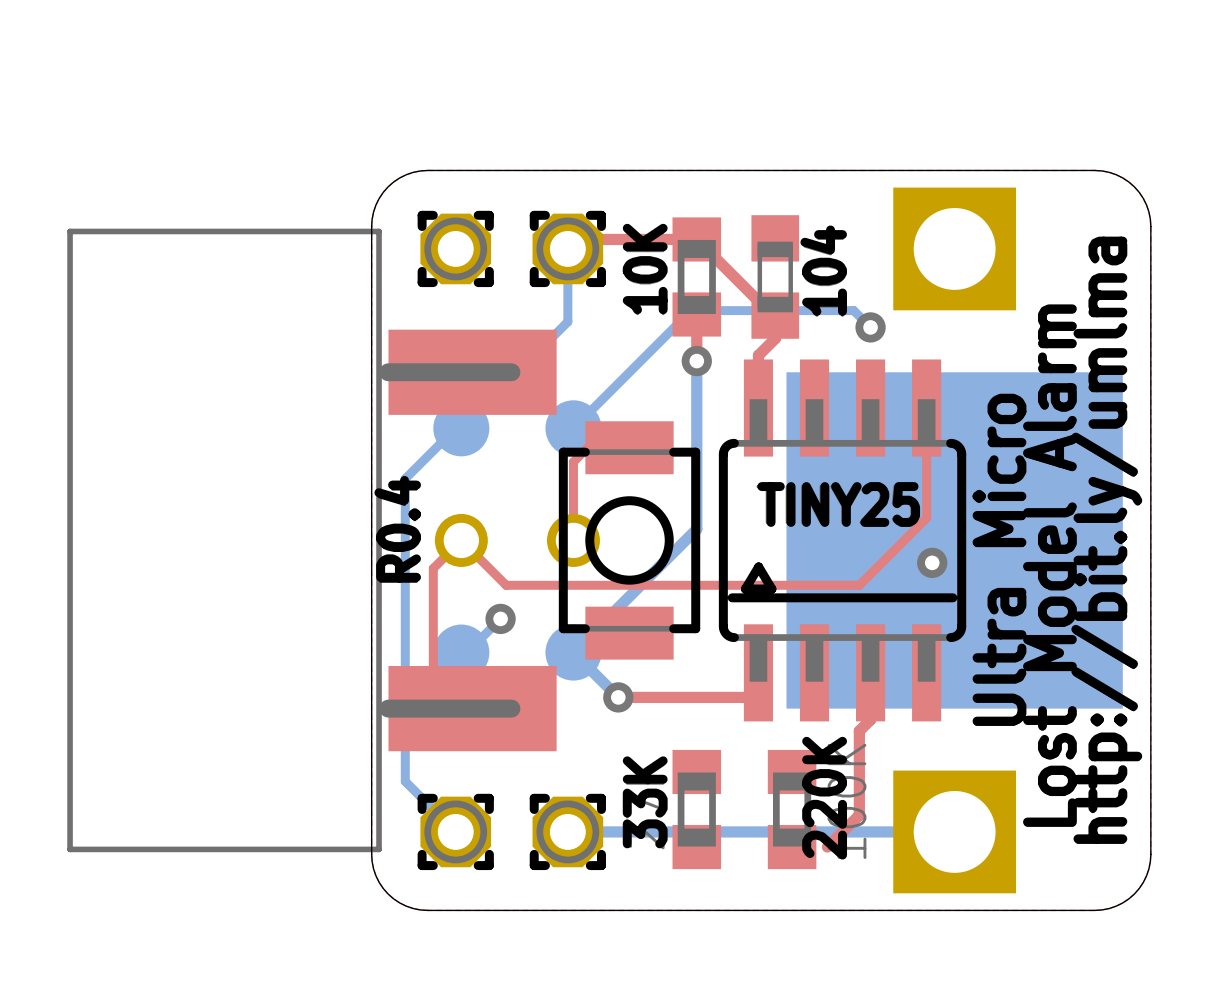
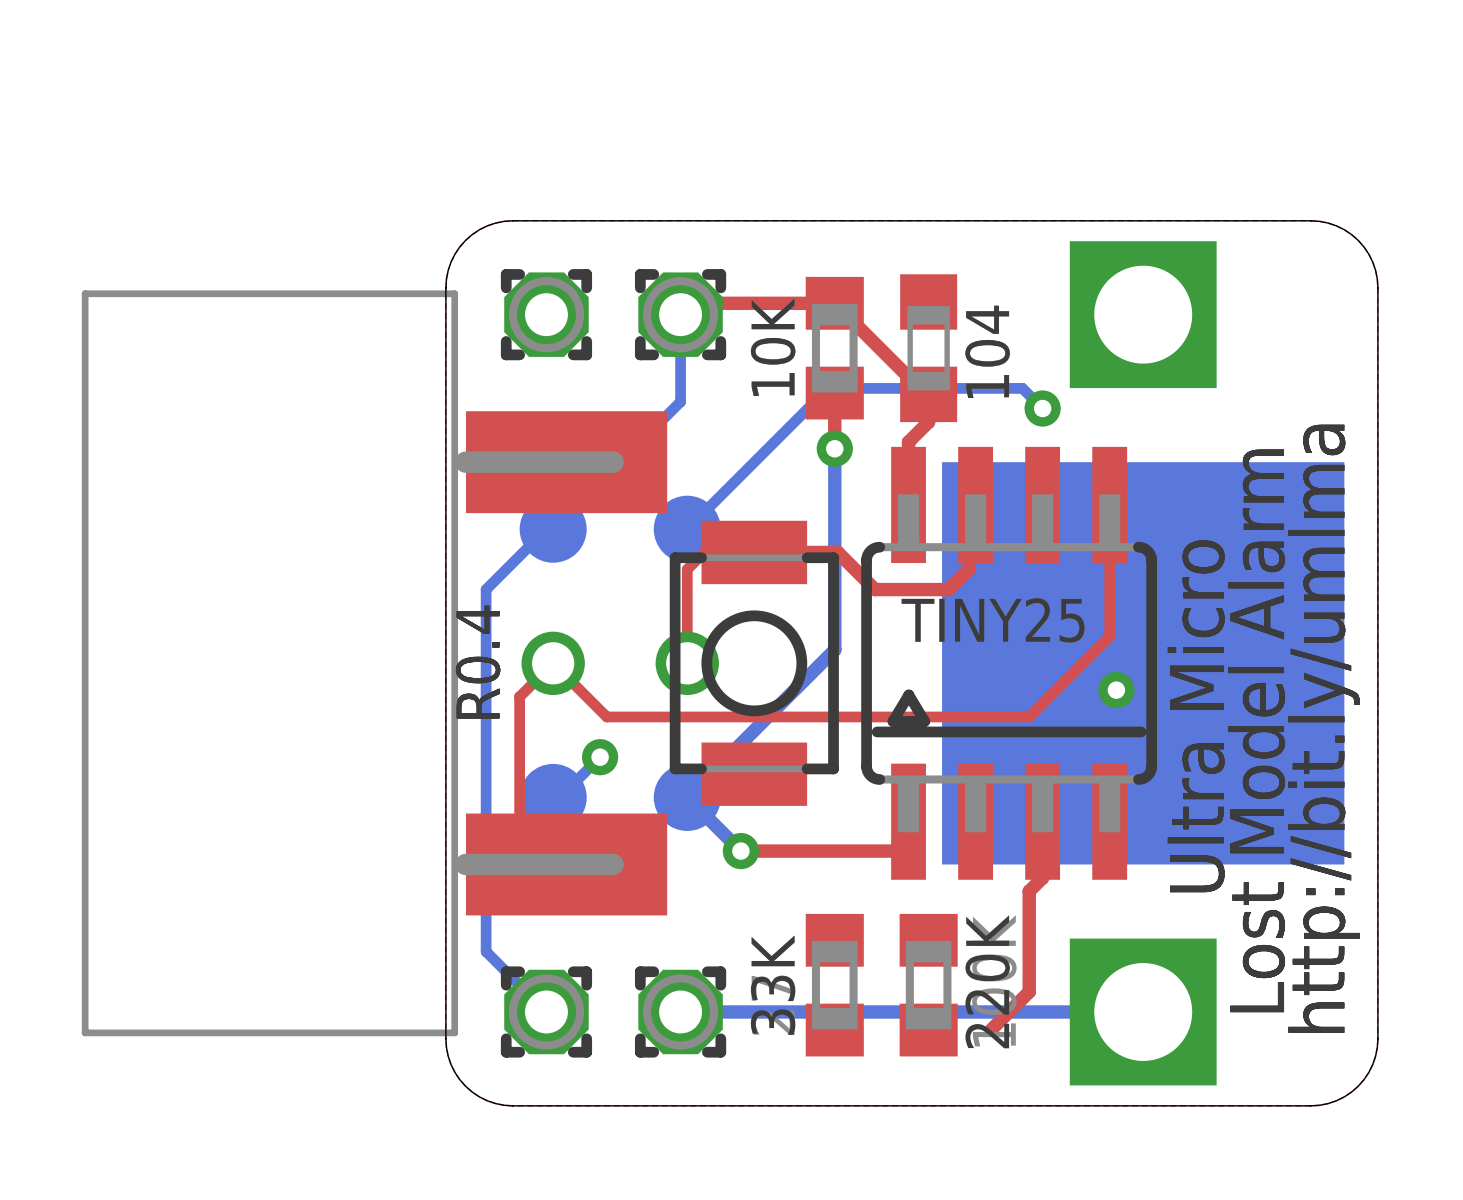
top track: none -> (975, 504) (968, 569) (948, 589) (875, 589) (837, 552) (704, 552)
part position: (792, 809) -> (928, 985)

